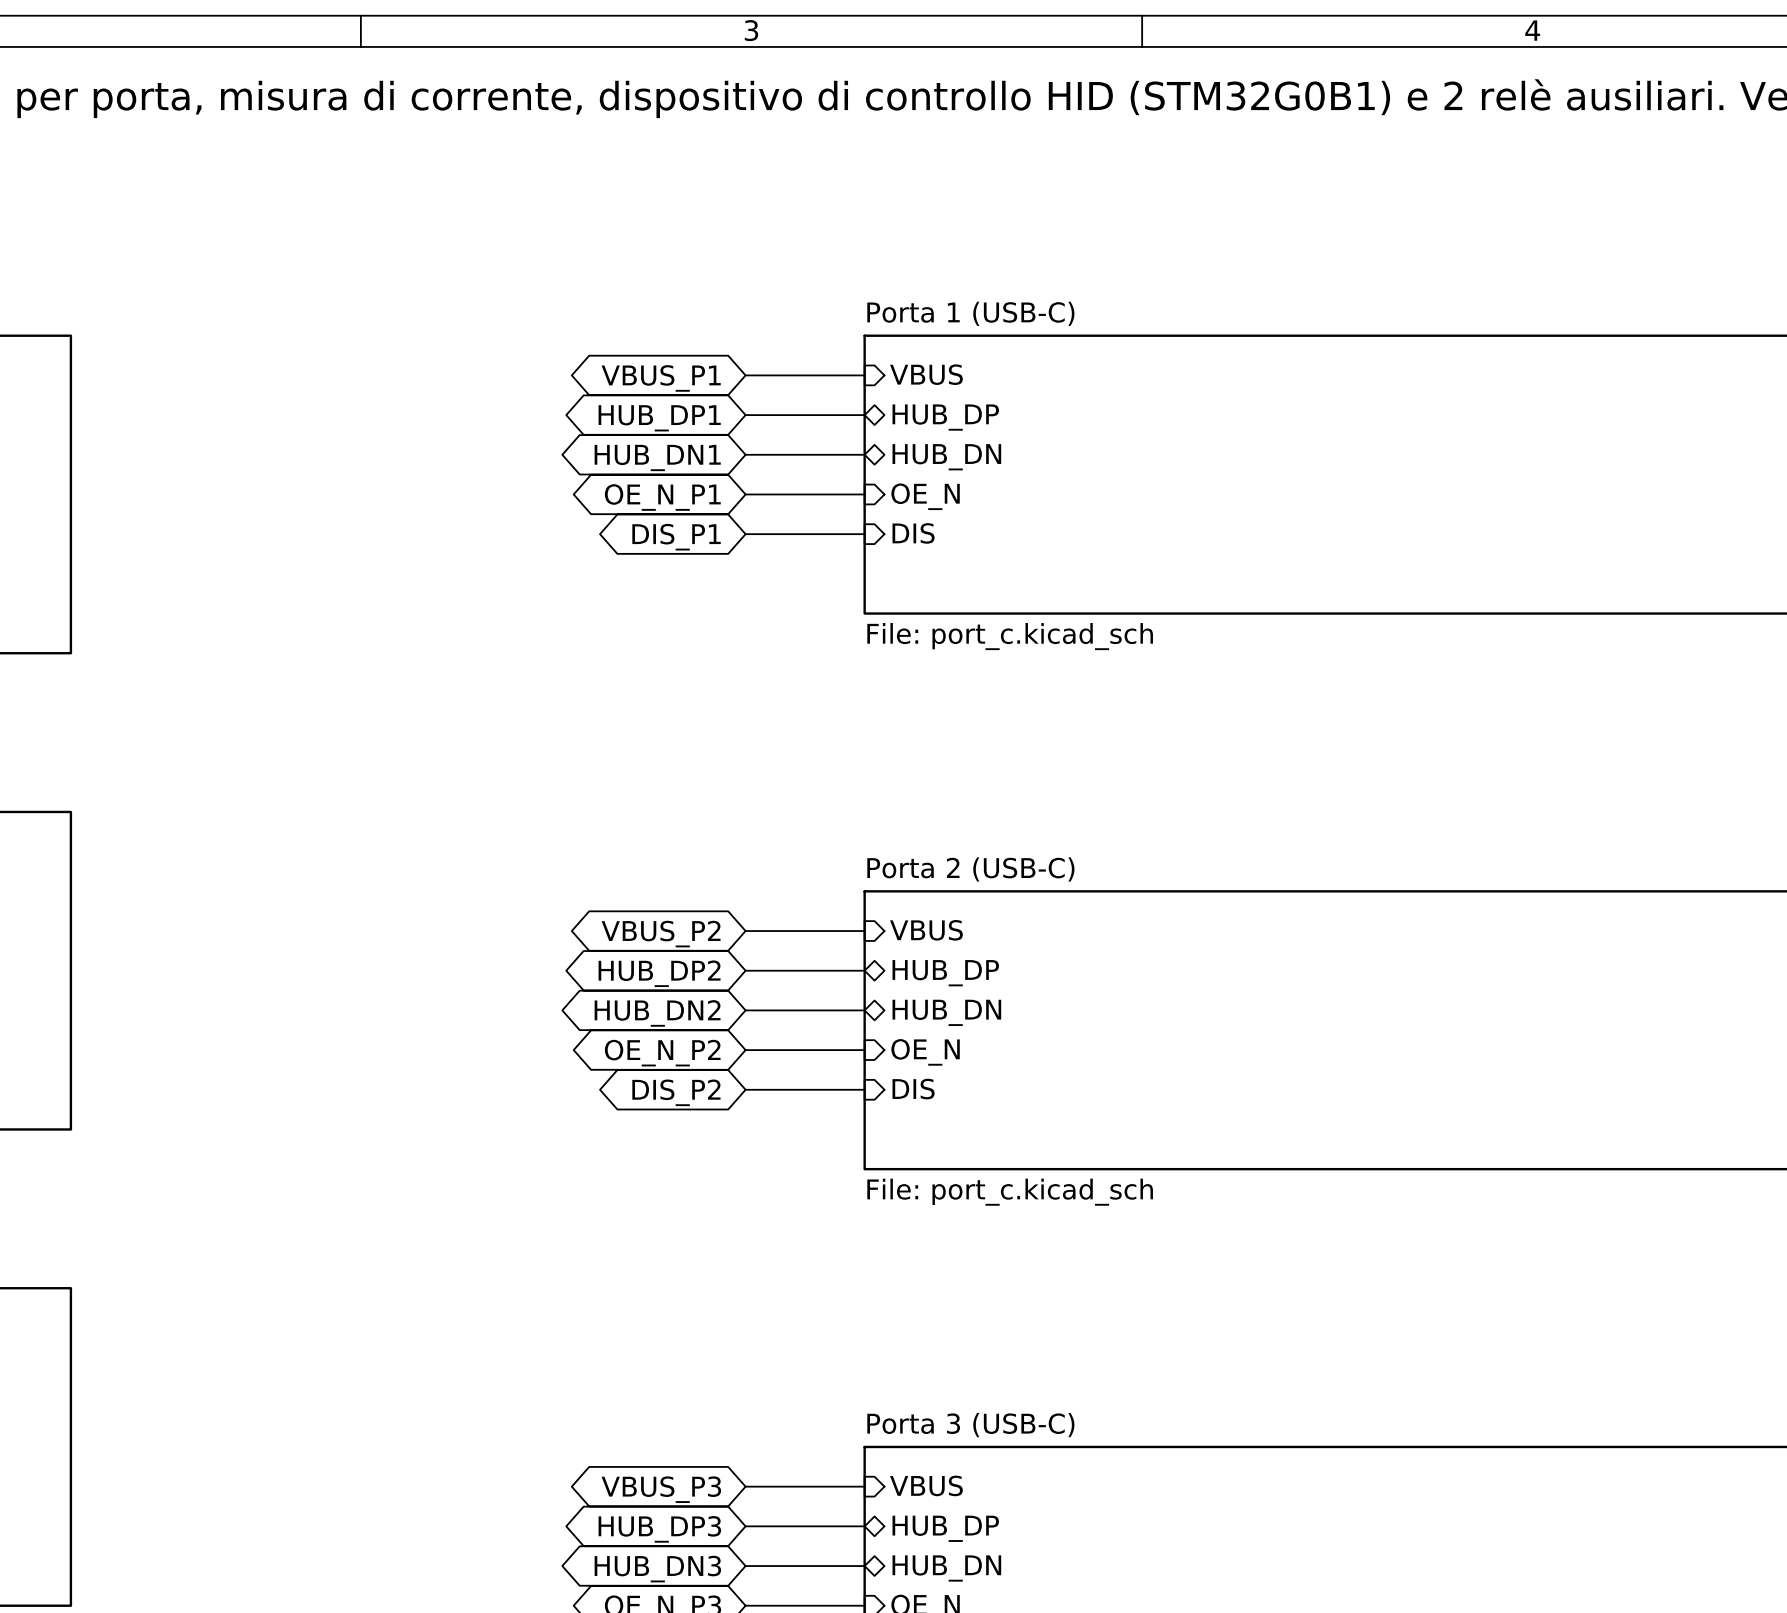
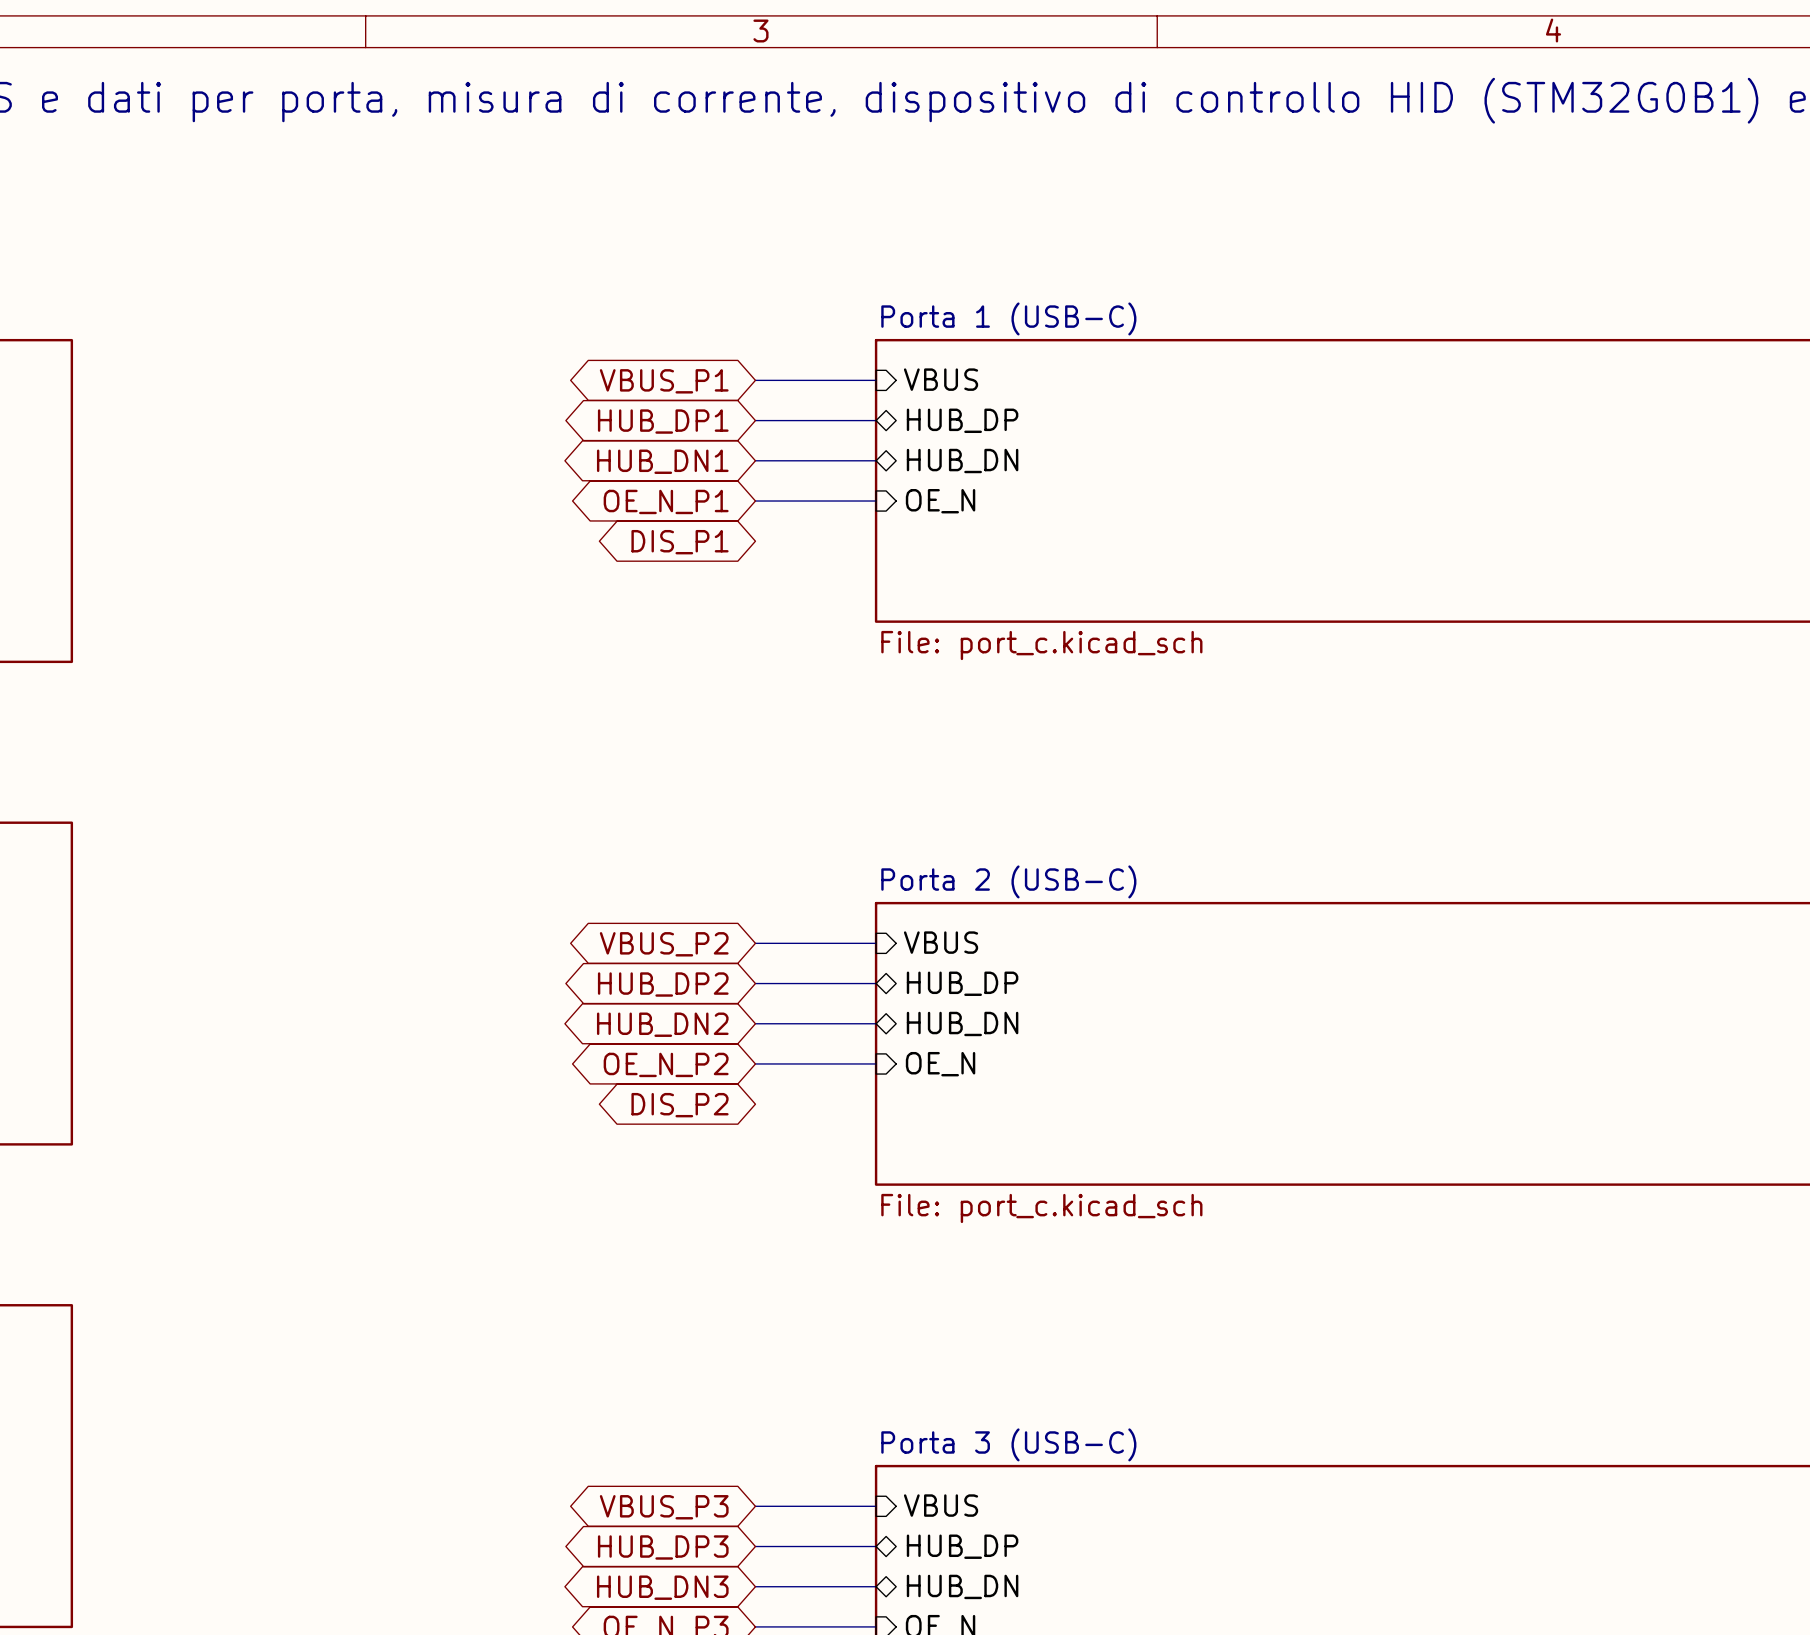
sheet pin: DIS (913, 533) -> none
wire: (745, 534) (864, 534) -> none
wire: (745, 1089) (864, 1089) -> none
sheet pin: DIS (913, 1089) -> none

